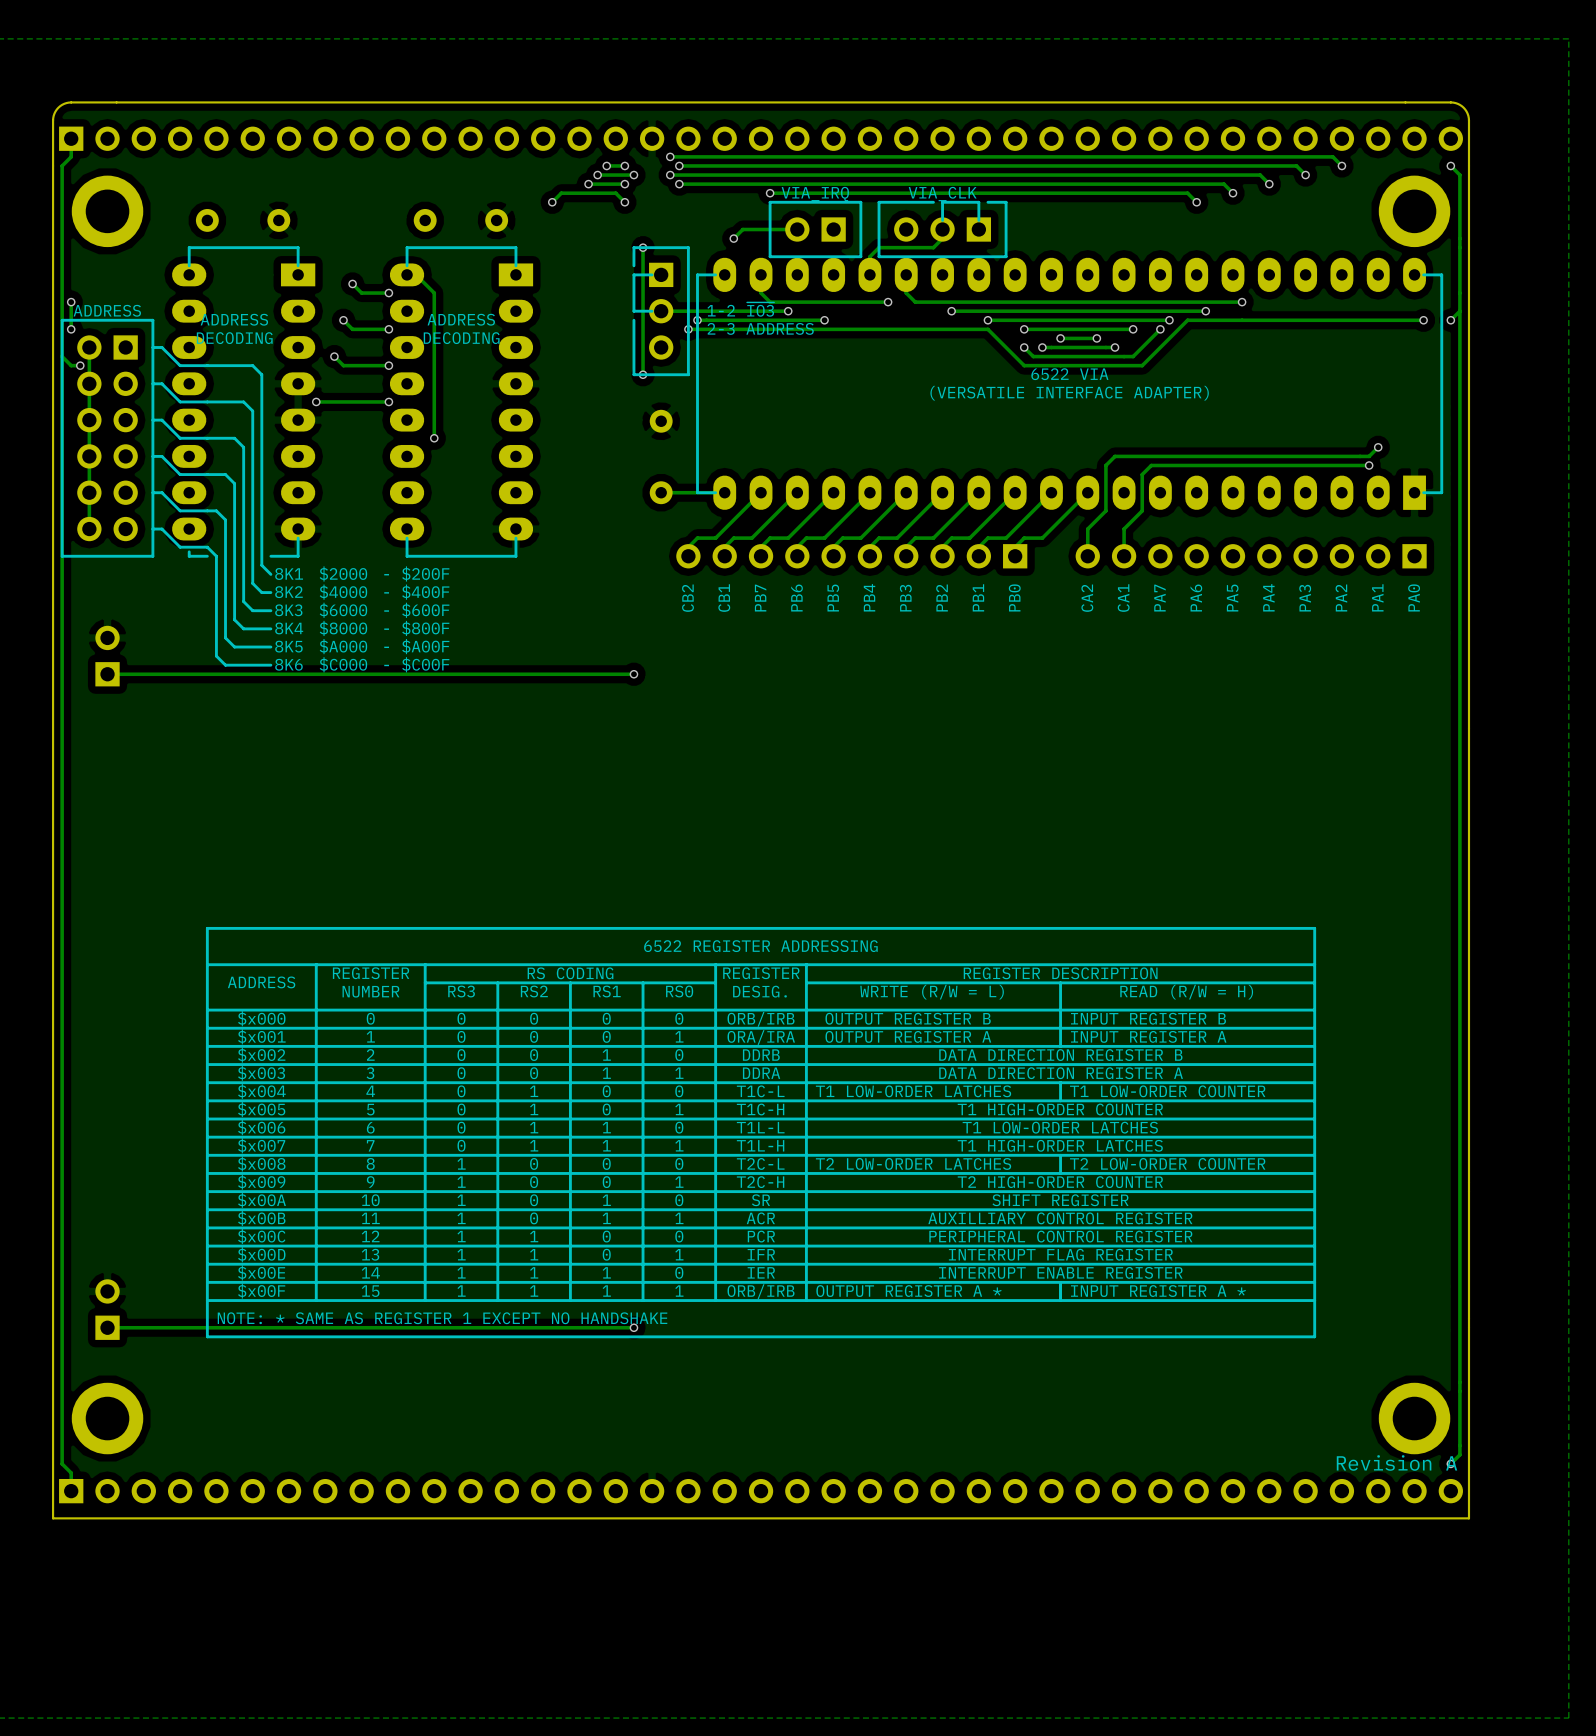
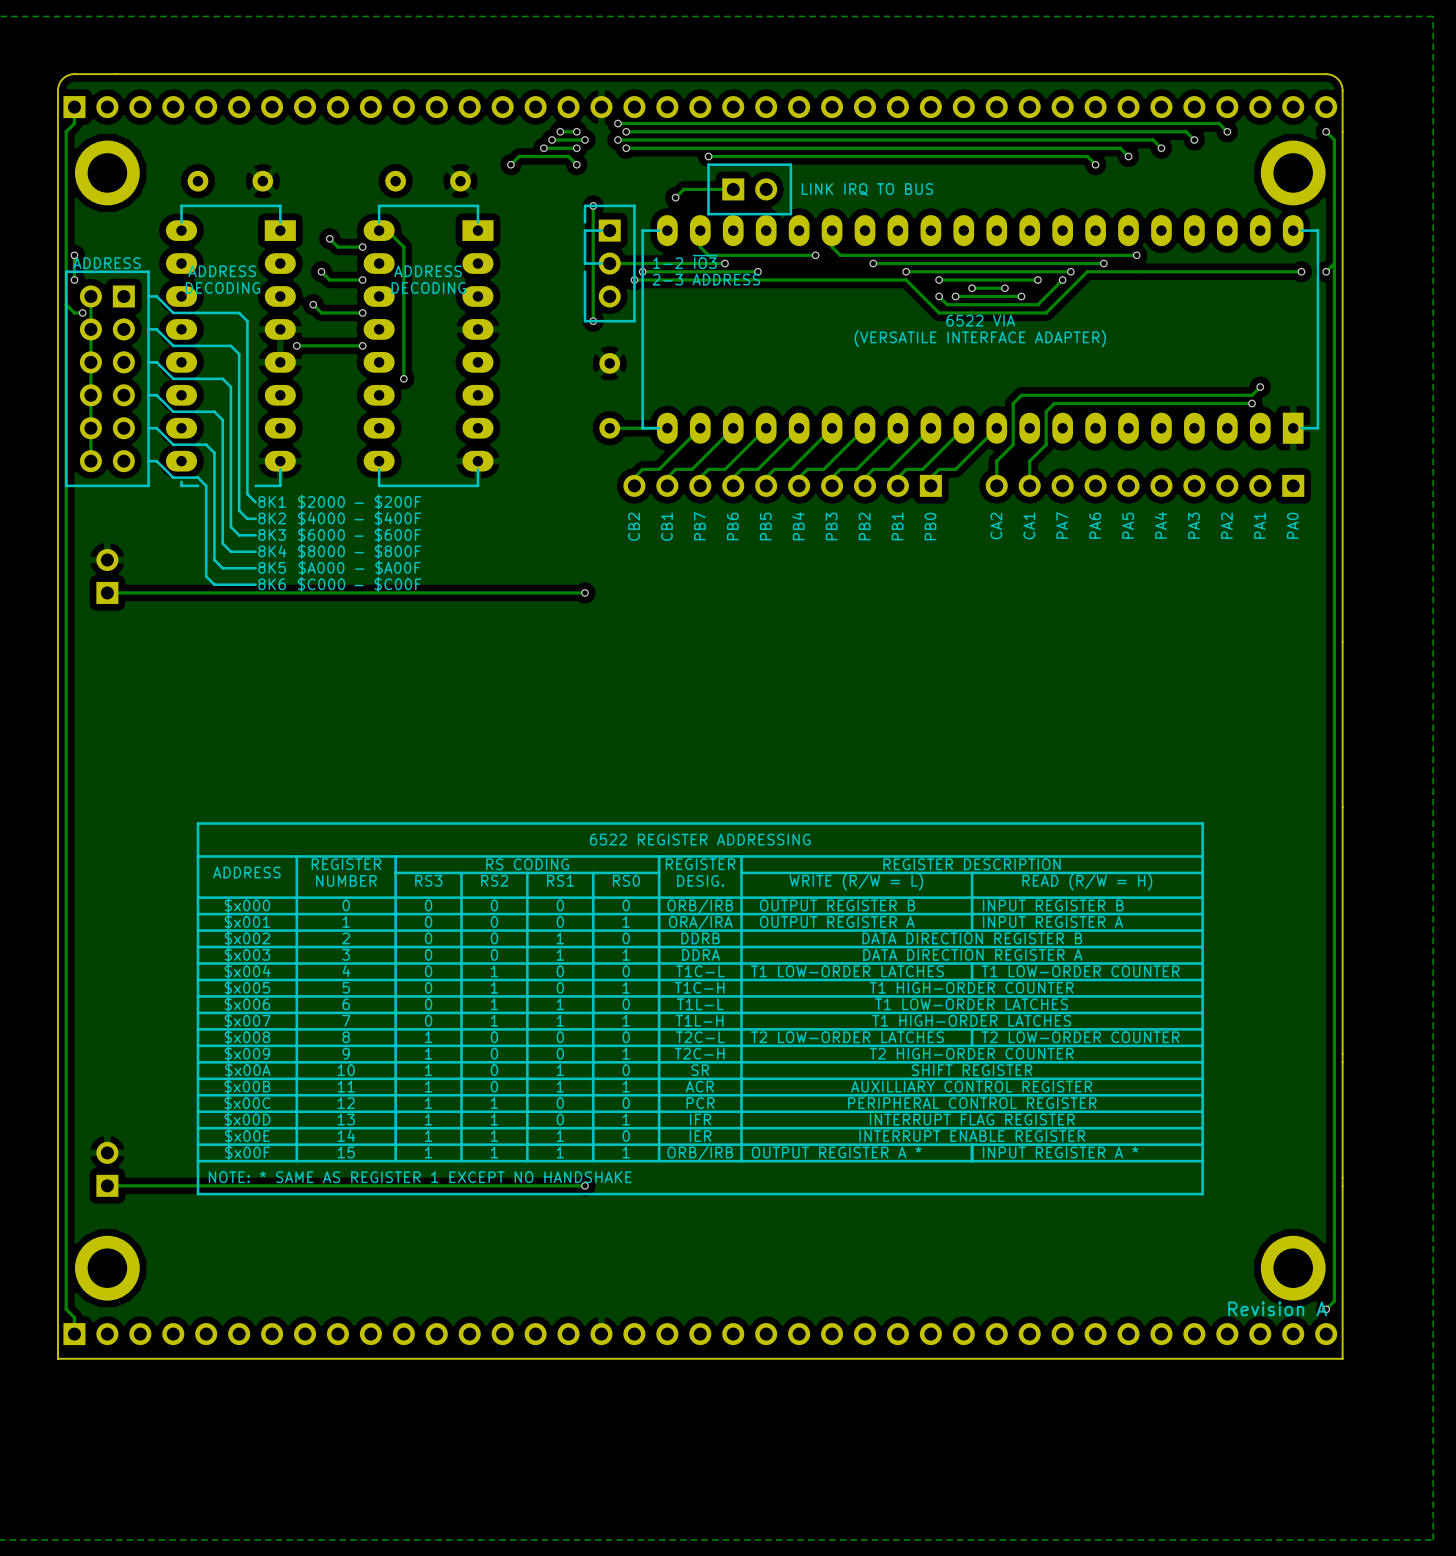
text: VIA_IRQ (815, 194) -> none
text: VIA_CLK (942, 194) -> none
line: (987, 202) (1006, 202) (1006, 256) (879, 256) (879, 202) (933, 202) -> none
line: (978, 220) (978, 202) (942, 202) (942, 220) -> none
part rotation: 0° (815, 229) -> 180° (749, 189)
track: (942, 229) (942, 238) (933, 247) (879, 247) (869, 256) (869, 274) -> none
part: (942, 229) -> none
text: none -> LINK IRQ TO BUS (867, 189)

